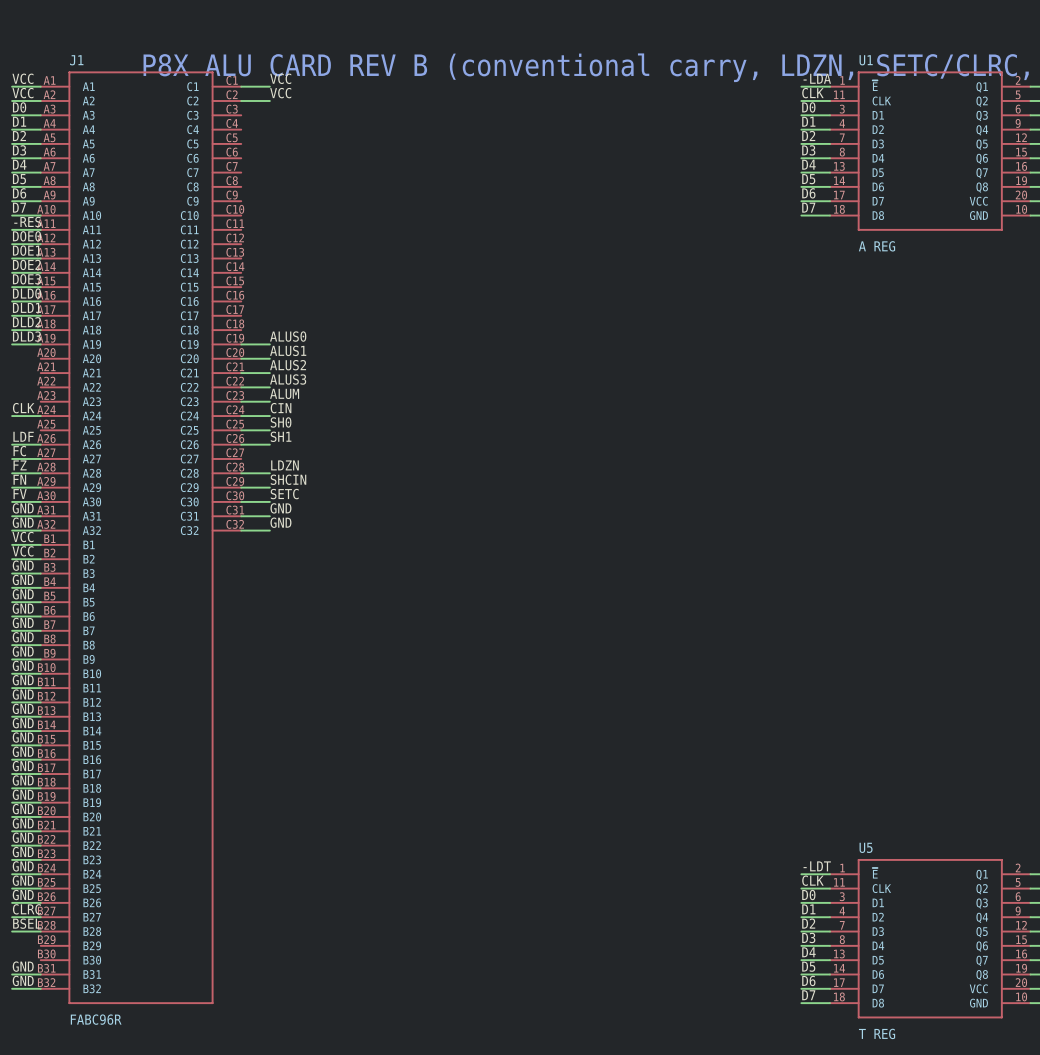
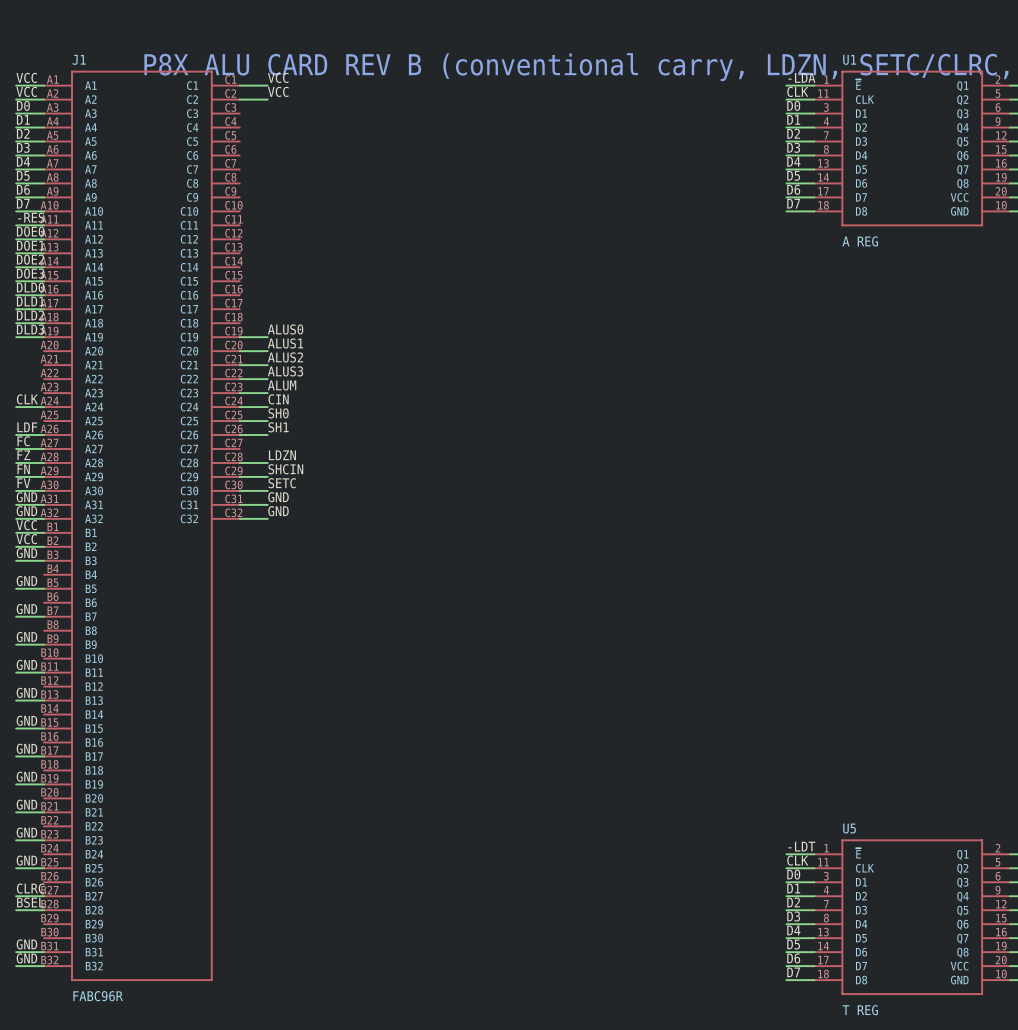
label: GND (23, 579) -> none
wire: (12, 587) (40, 587) -> none
label: GND (23, 608) -> none
wire: (12, 616) (40, 616) -> none
label: GND (23, 637) -> none
wire: (12, 645) (40, 645) -> none
label: GND (23, 665) -> none
wire: (12, 673) (40, 673) -> none
label: GND (23, 694) -> none
wire: (12, 702) (40, 702) -> none
label: GND (23, 723) -> none
wire: (12, 731) (40, 731) -> none
label: GND (23, 751) -> none
wire: (12, 759) (40, 759) -> none
label: GND (23, 780) -> none
wire: (12, 788) (40, 788) -> none
label: GND (23, 809) -> none
wire: (12, 816) (40, 816) -> none
label: GND (23, 837) -> none
wire: (12, 845) (40, 845) -> none
label: GND (23, 866) -> none
wire: (12, 874) (40, 874) -> none
label: GND (23, 895) -> none
wire: (12, 902) (40, 902) -> none

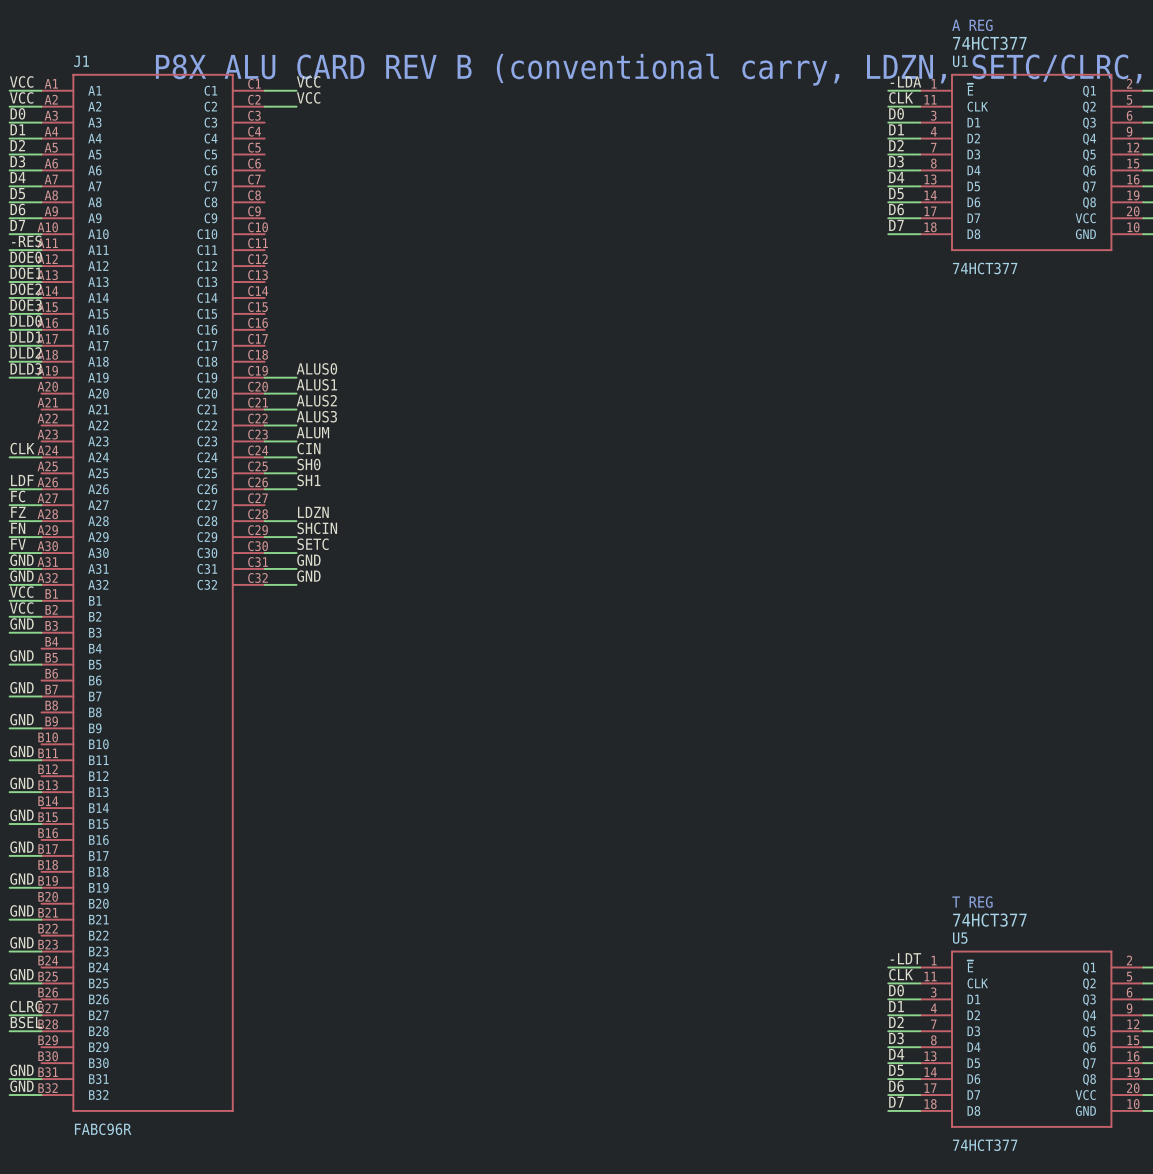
text: none -> A REG (972, 25)
text: none -> 74HCT377 (989, 43)
U1 value: A REG (860, 241) -> 74HCT377 (985, 268)
text: none -> T REG (972, 902)
text: none -> 74HCT377 (989, 920)
U5 value: T REG (860, 1010) -> 74HCT377 (985, 1145)

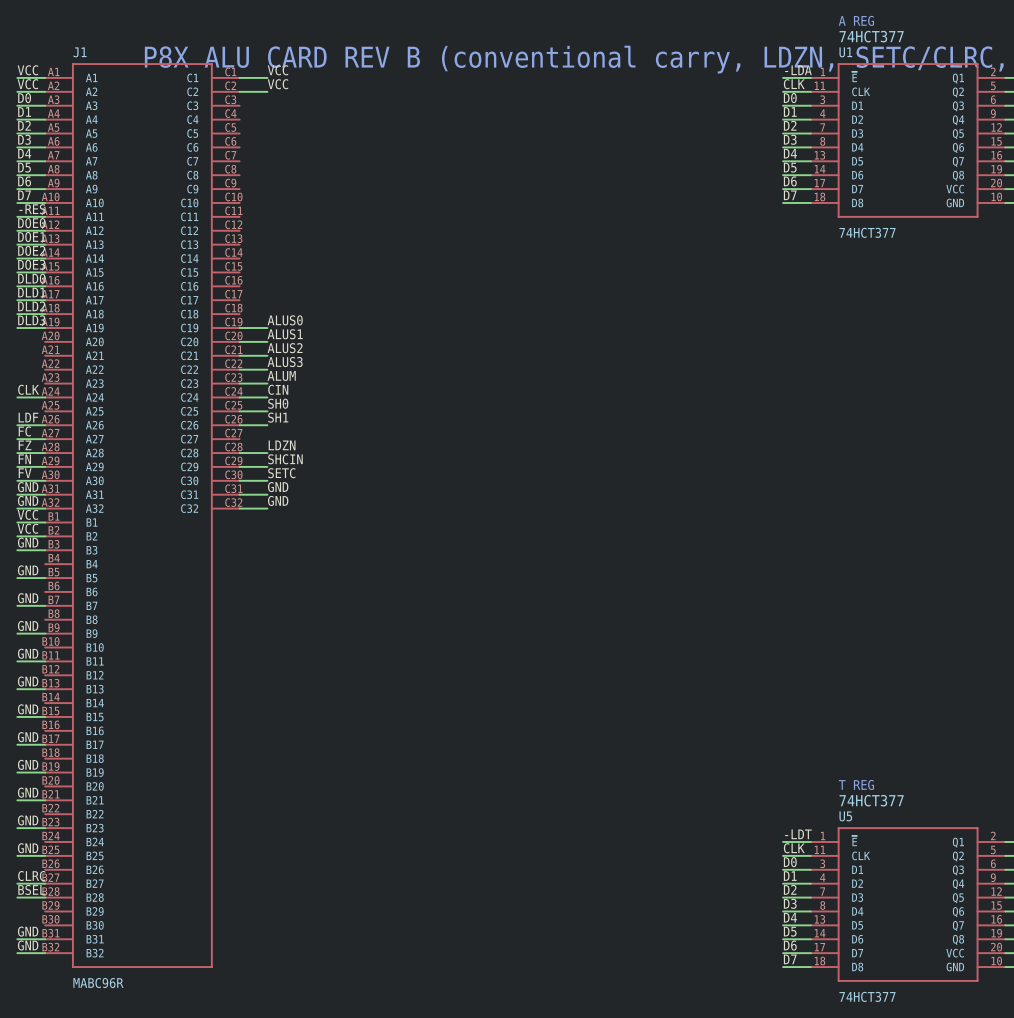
J1 value: FABC96R (103, 1129) -> MABC96R (98, 983)

